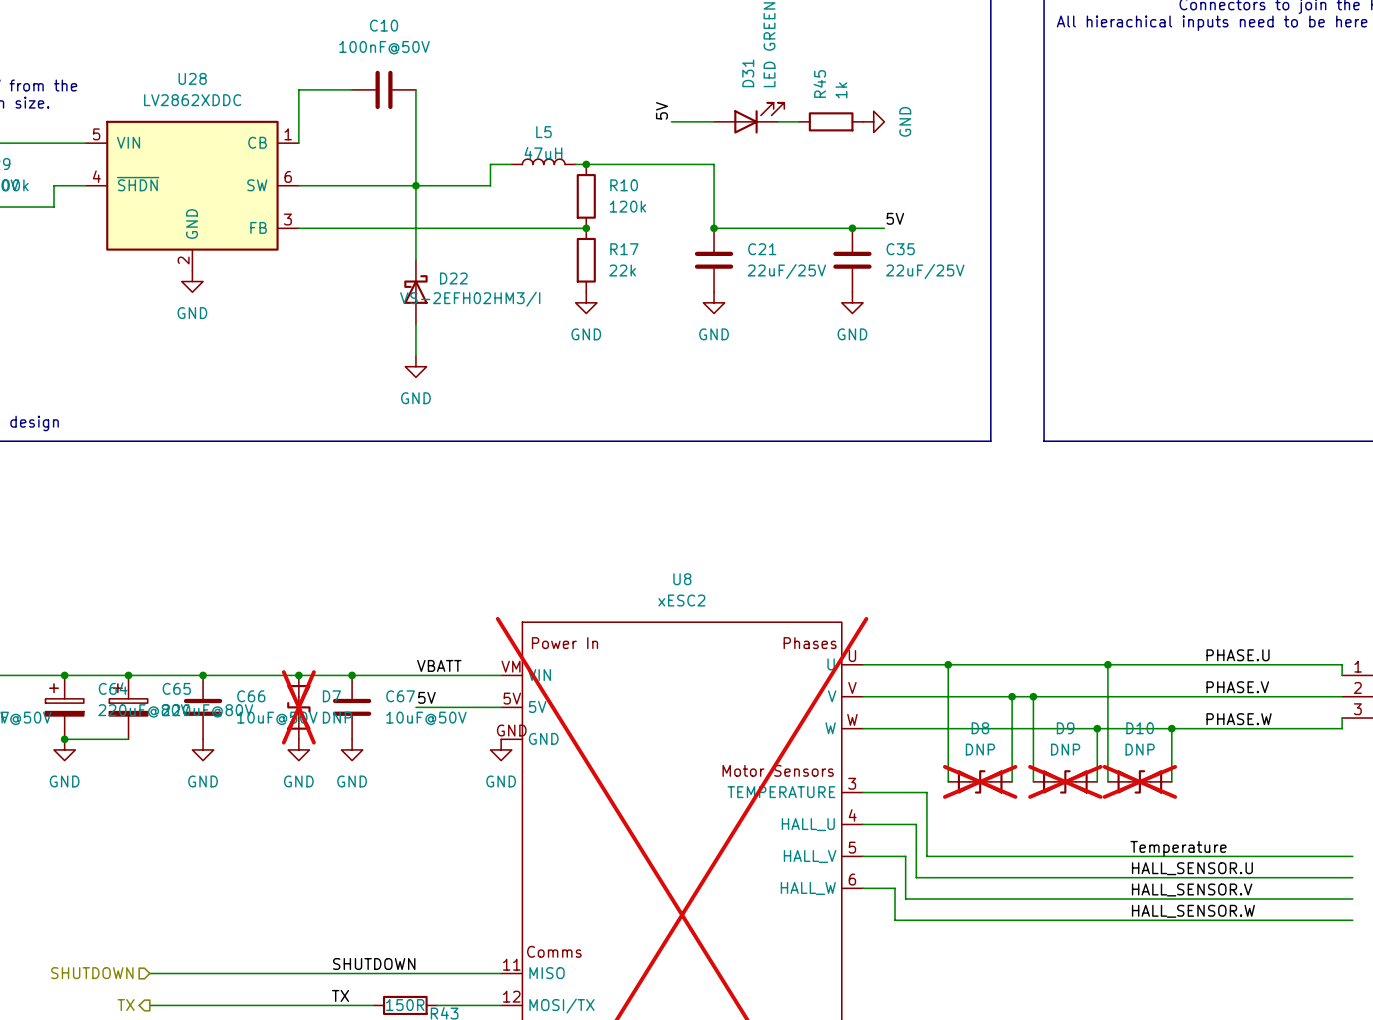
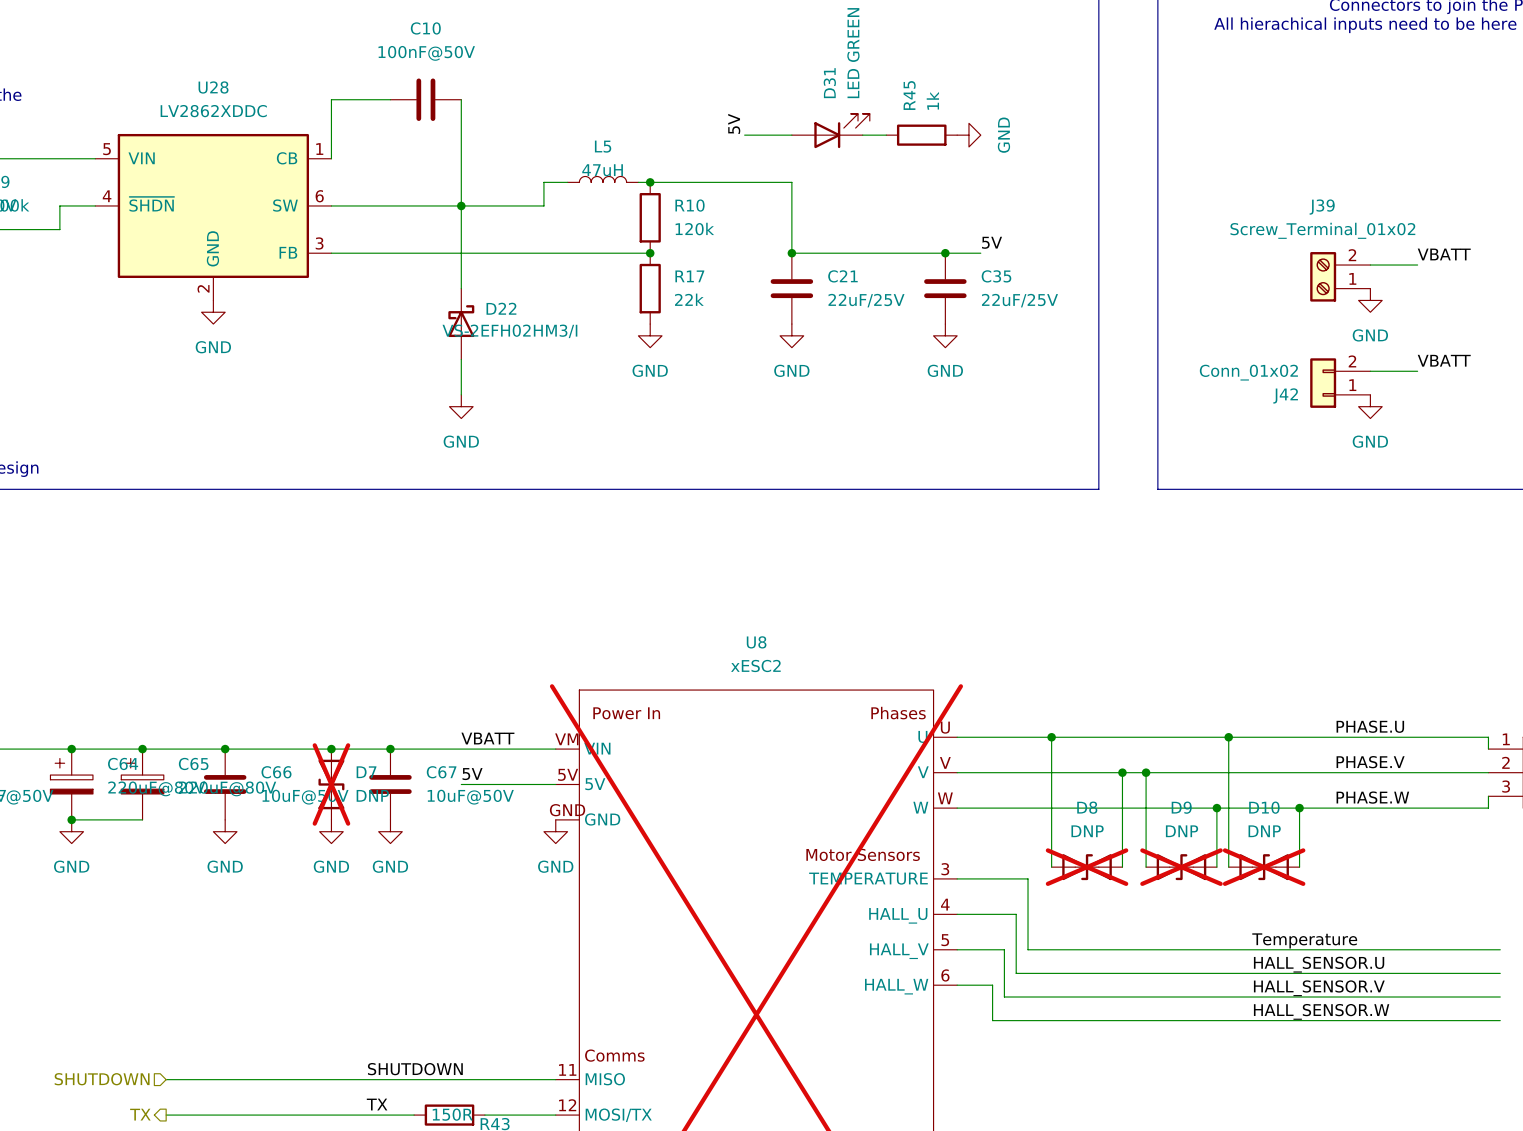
label: none -> VBATT (1444, 254)
wire: none -> (1370, 265) (1417, 265)
J39: none -> Screw_Terminal_01x02 (1340, 276)
power symbol: none -> GND (1370, 300)
label: none -> VBATT (1444, 360)
wire: none -> (1370, 371) (1417, 371)
J42: none -> Conn_01x02 (1340, 383)
power symbol: none -> GND (1370, 406)

